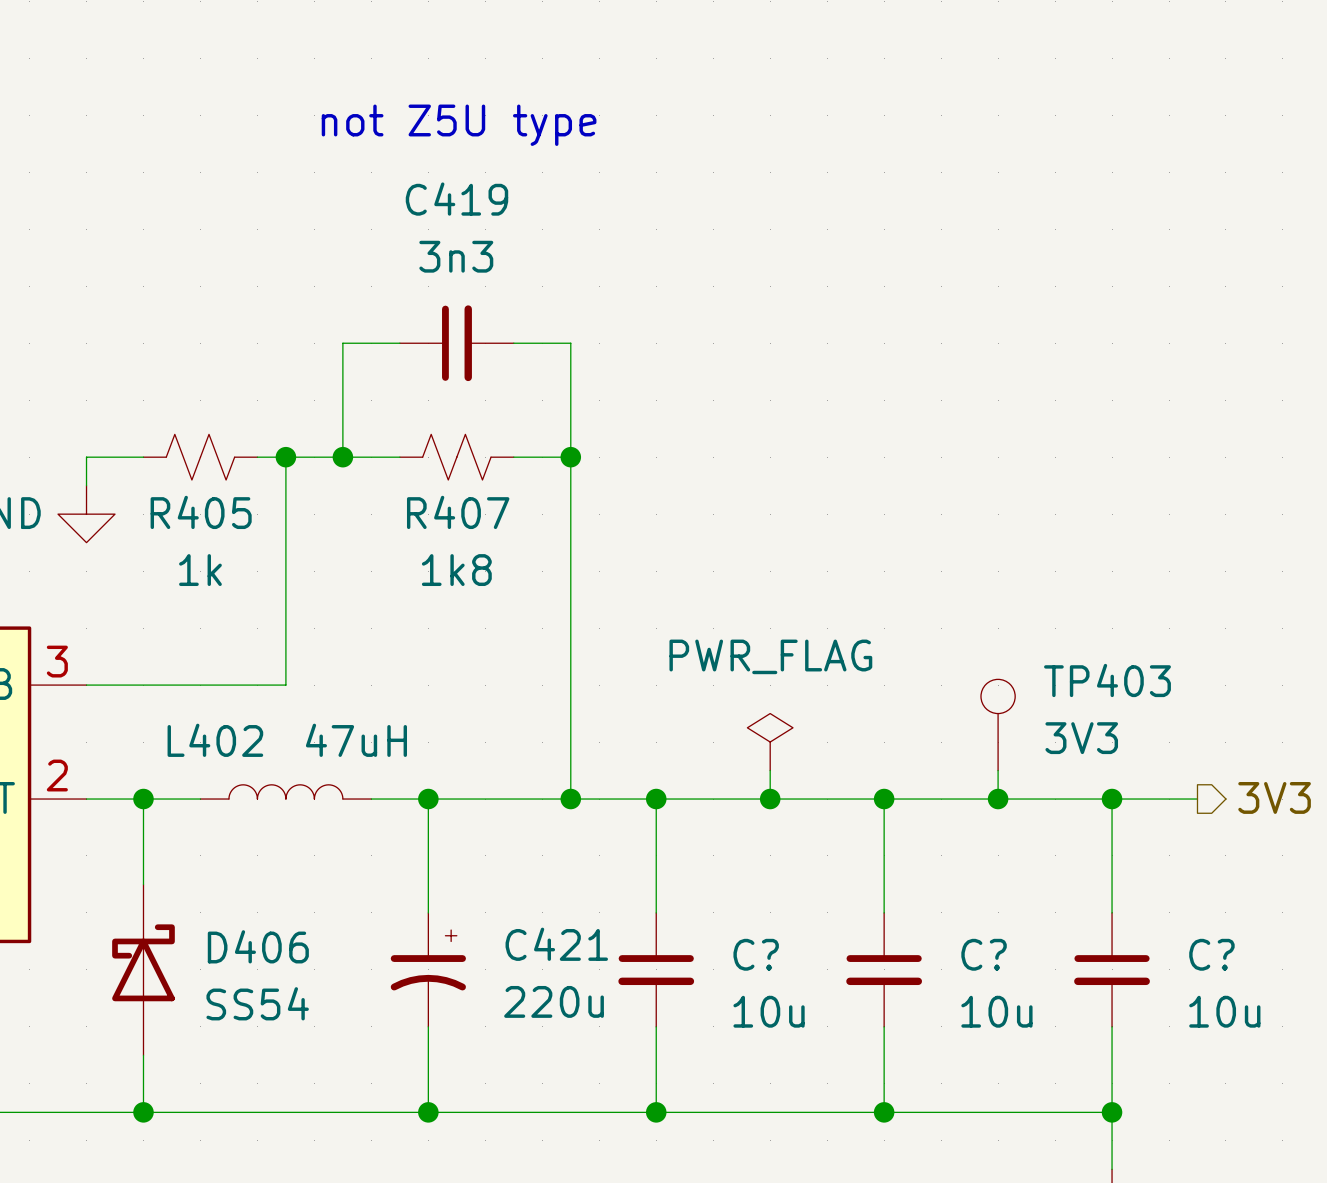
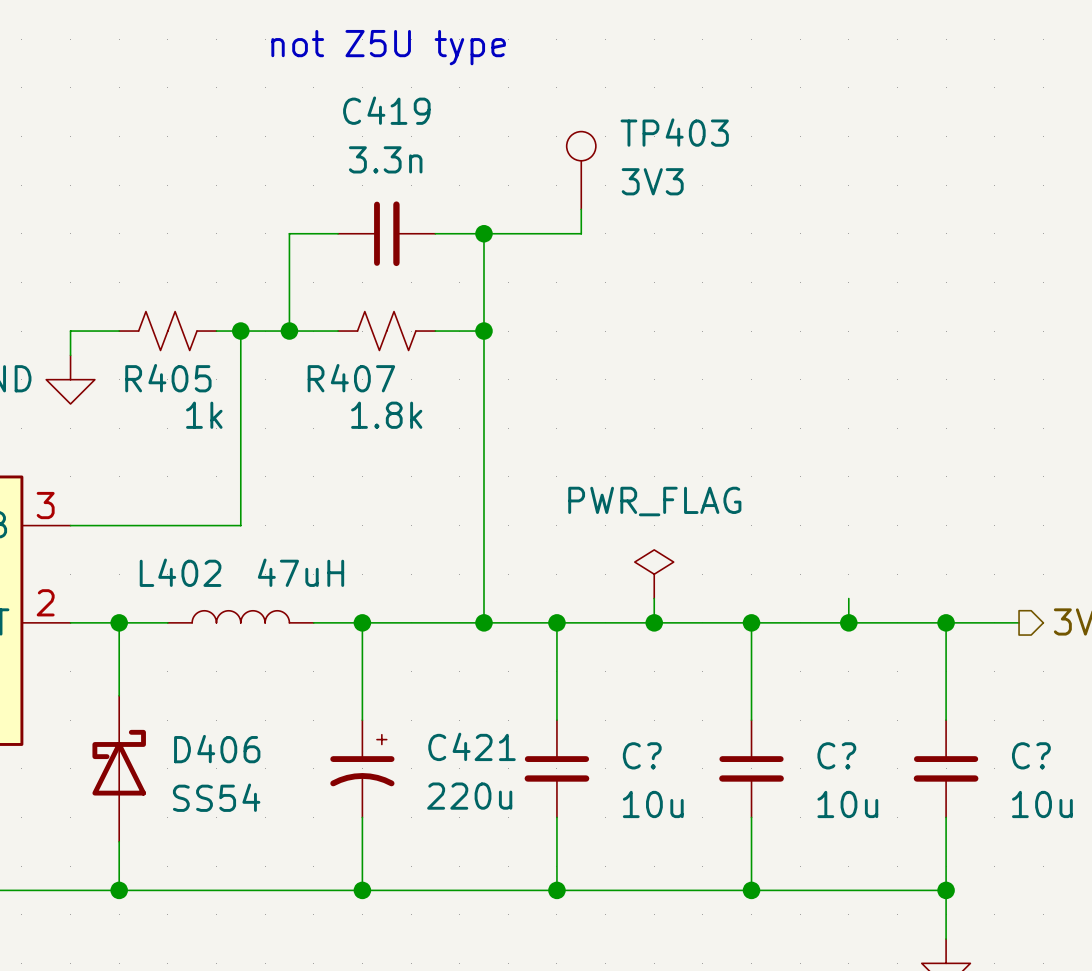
C419 value: 3n3 (456, 256) -> 3.3n (385, 159)
wire: none -> (581, 209) (581, 233) (483, 233)
junction: none -> (483, 233)
R407 name position: R407 (458, 512) -> R407 (351, 378)
R405 value position: 1k (200, 570) -> 1k (204, 415)
R407 value: 1k8 (456, 570) -> 1.8k (386, 415)
TP403 position: (998, 724) -> (581, 170)

